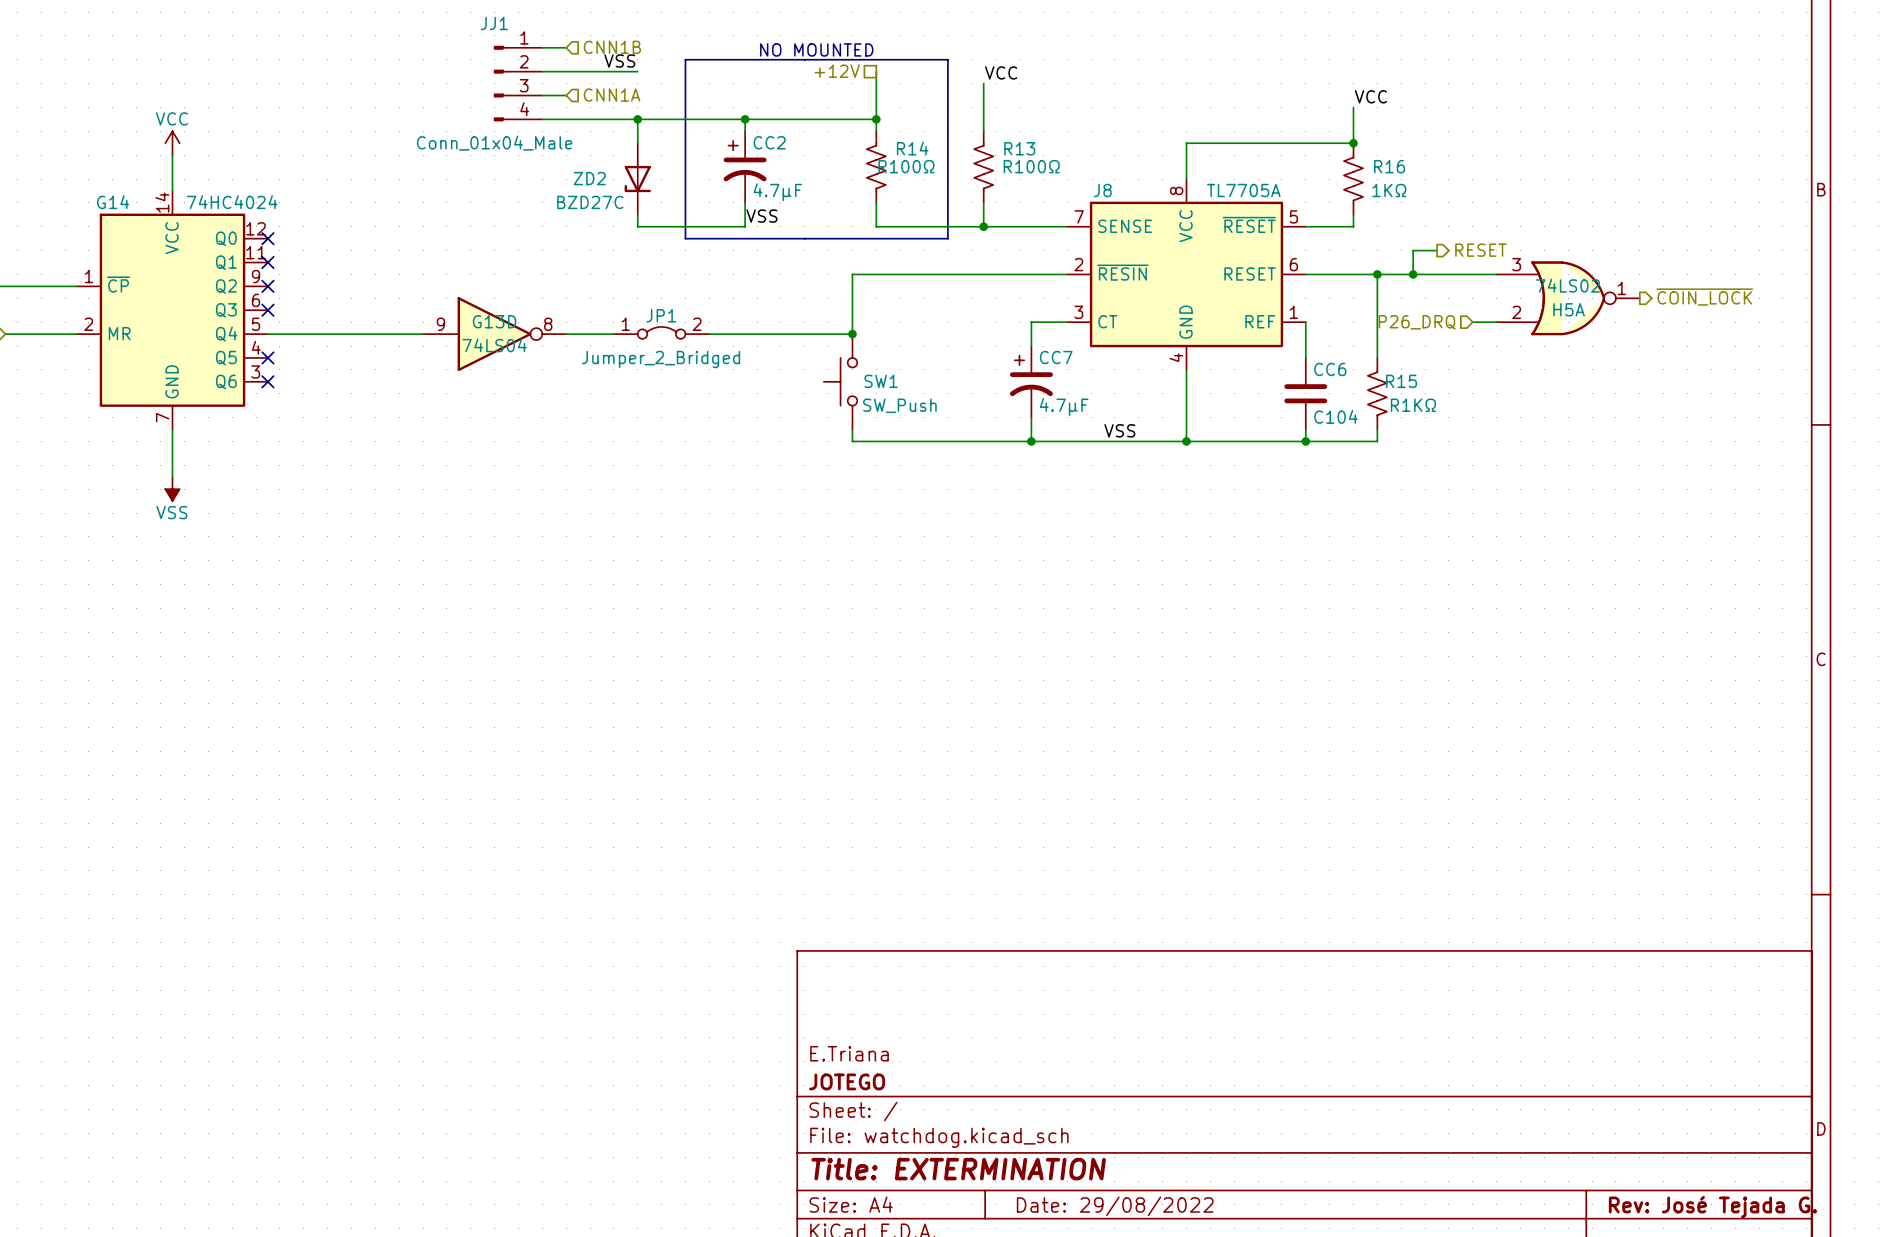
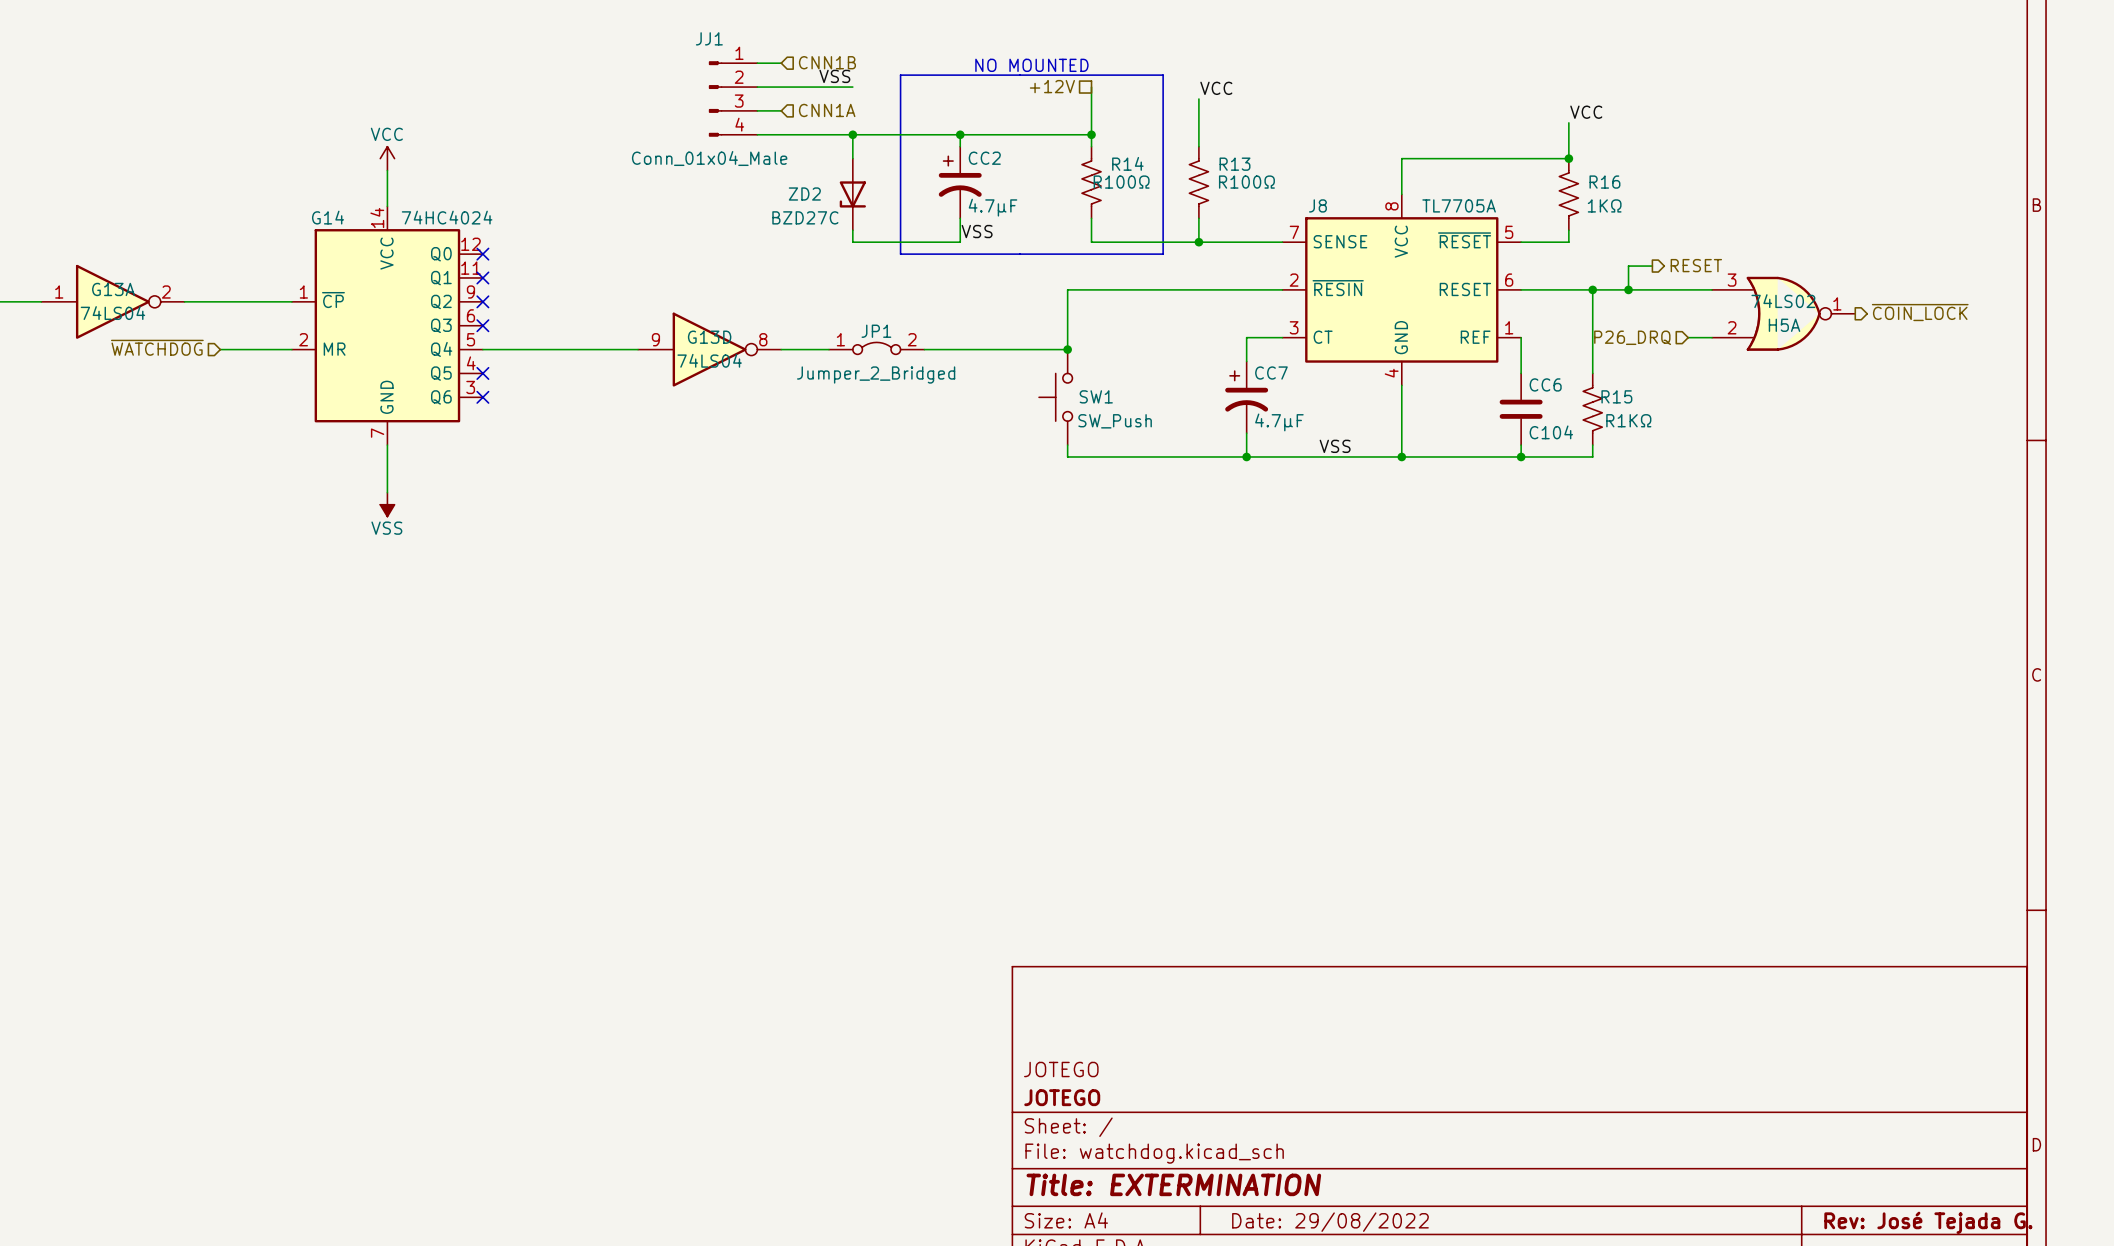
title block: E.Triana (849, 1053) -> JOTEGO (1061, 1069)

